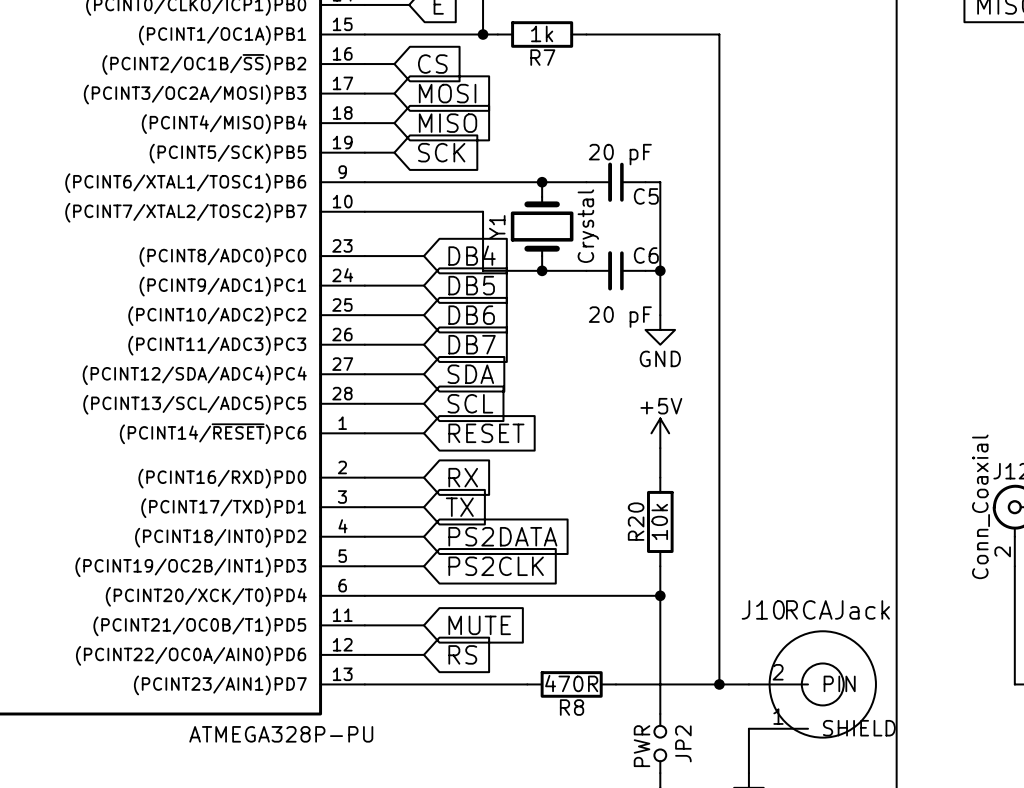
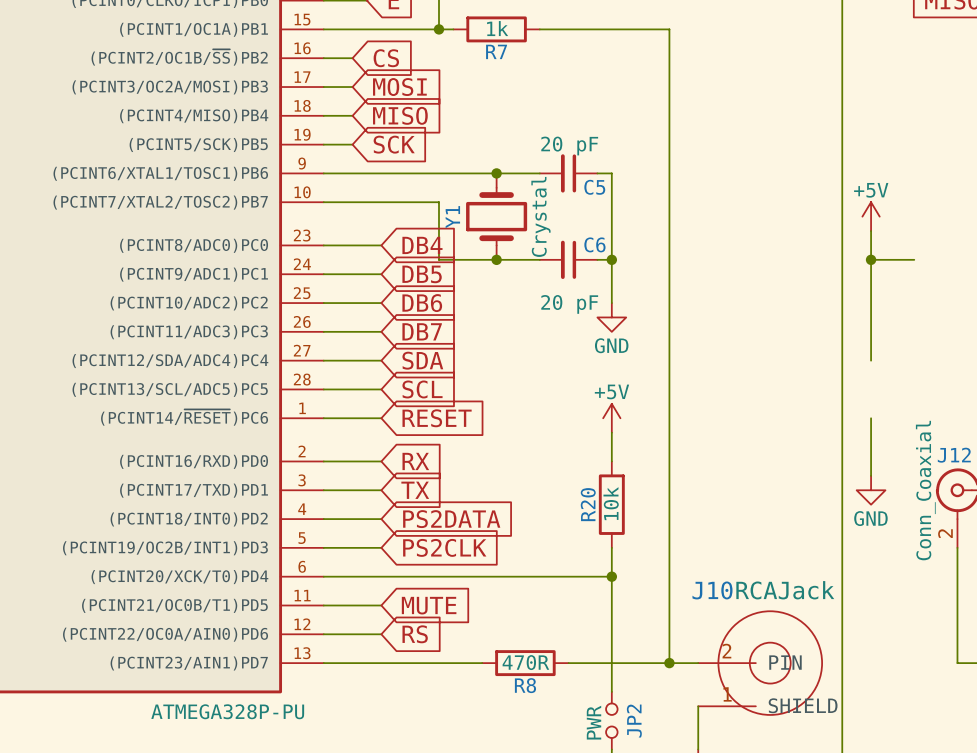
power symbol: none -> +5V (871, 216)
wire: none -> (871, 231) (871, 360)
wire: none -> (871, 259) (914, 259)
junction: none -> (871, 259)
wire: none -> (871, 418) (871, 475)
power symbol: none -> GND (871, 490)

